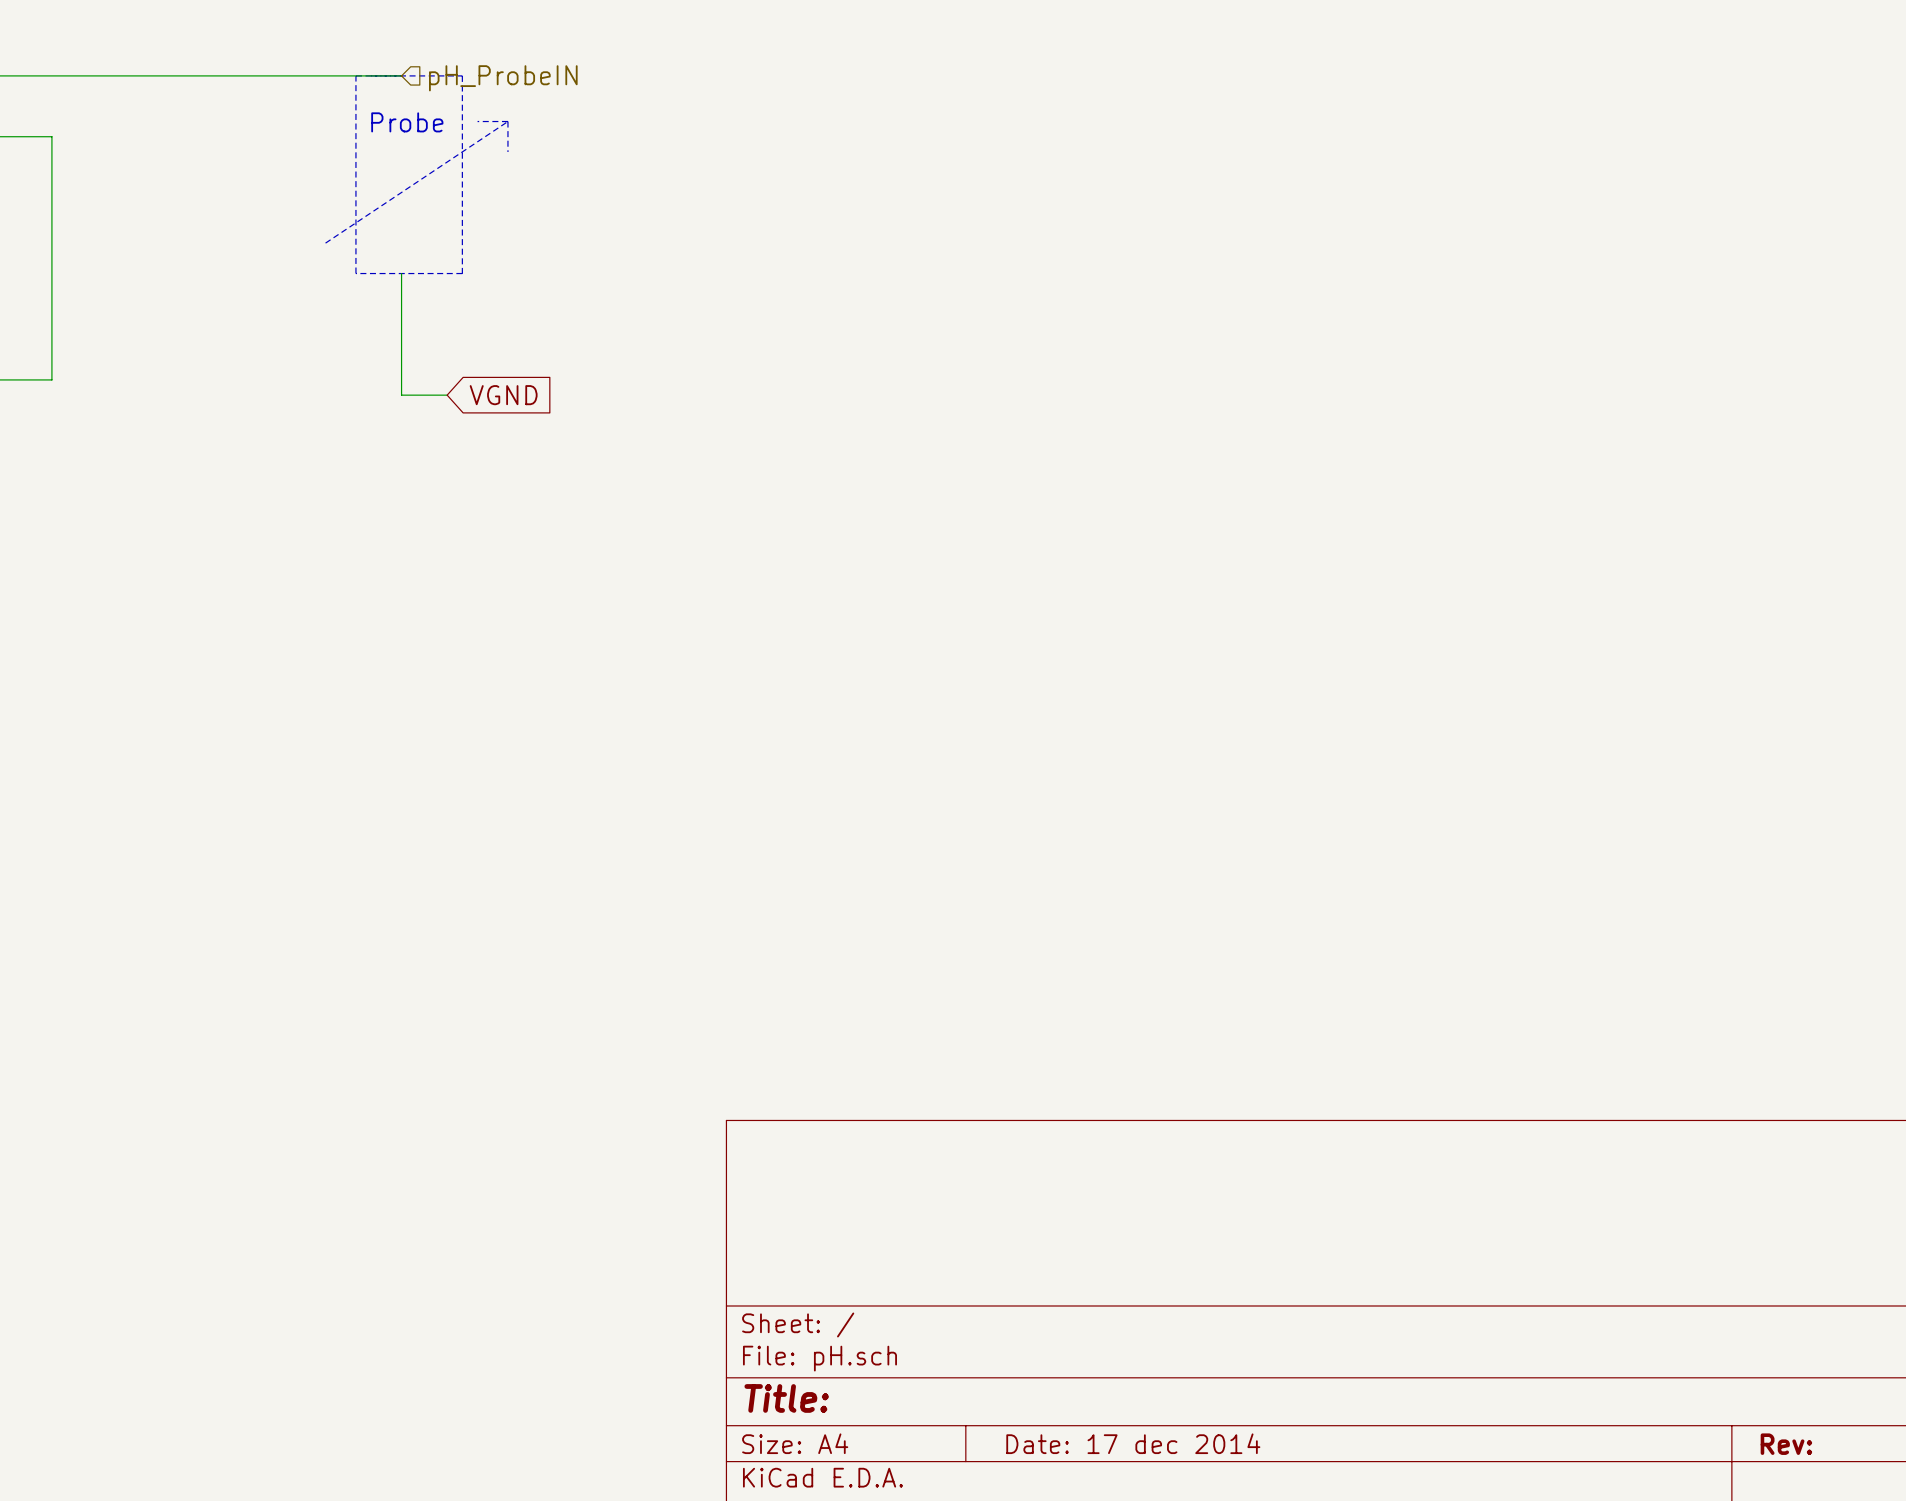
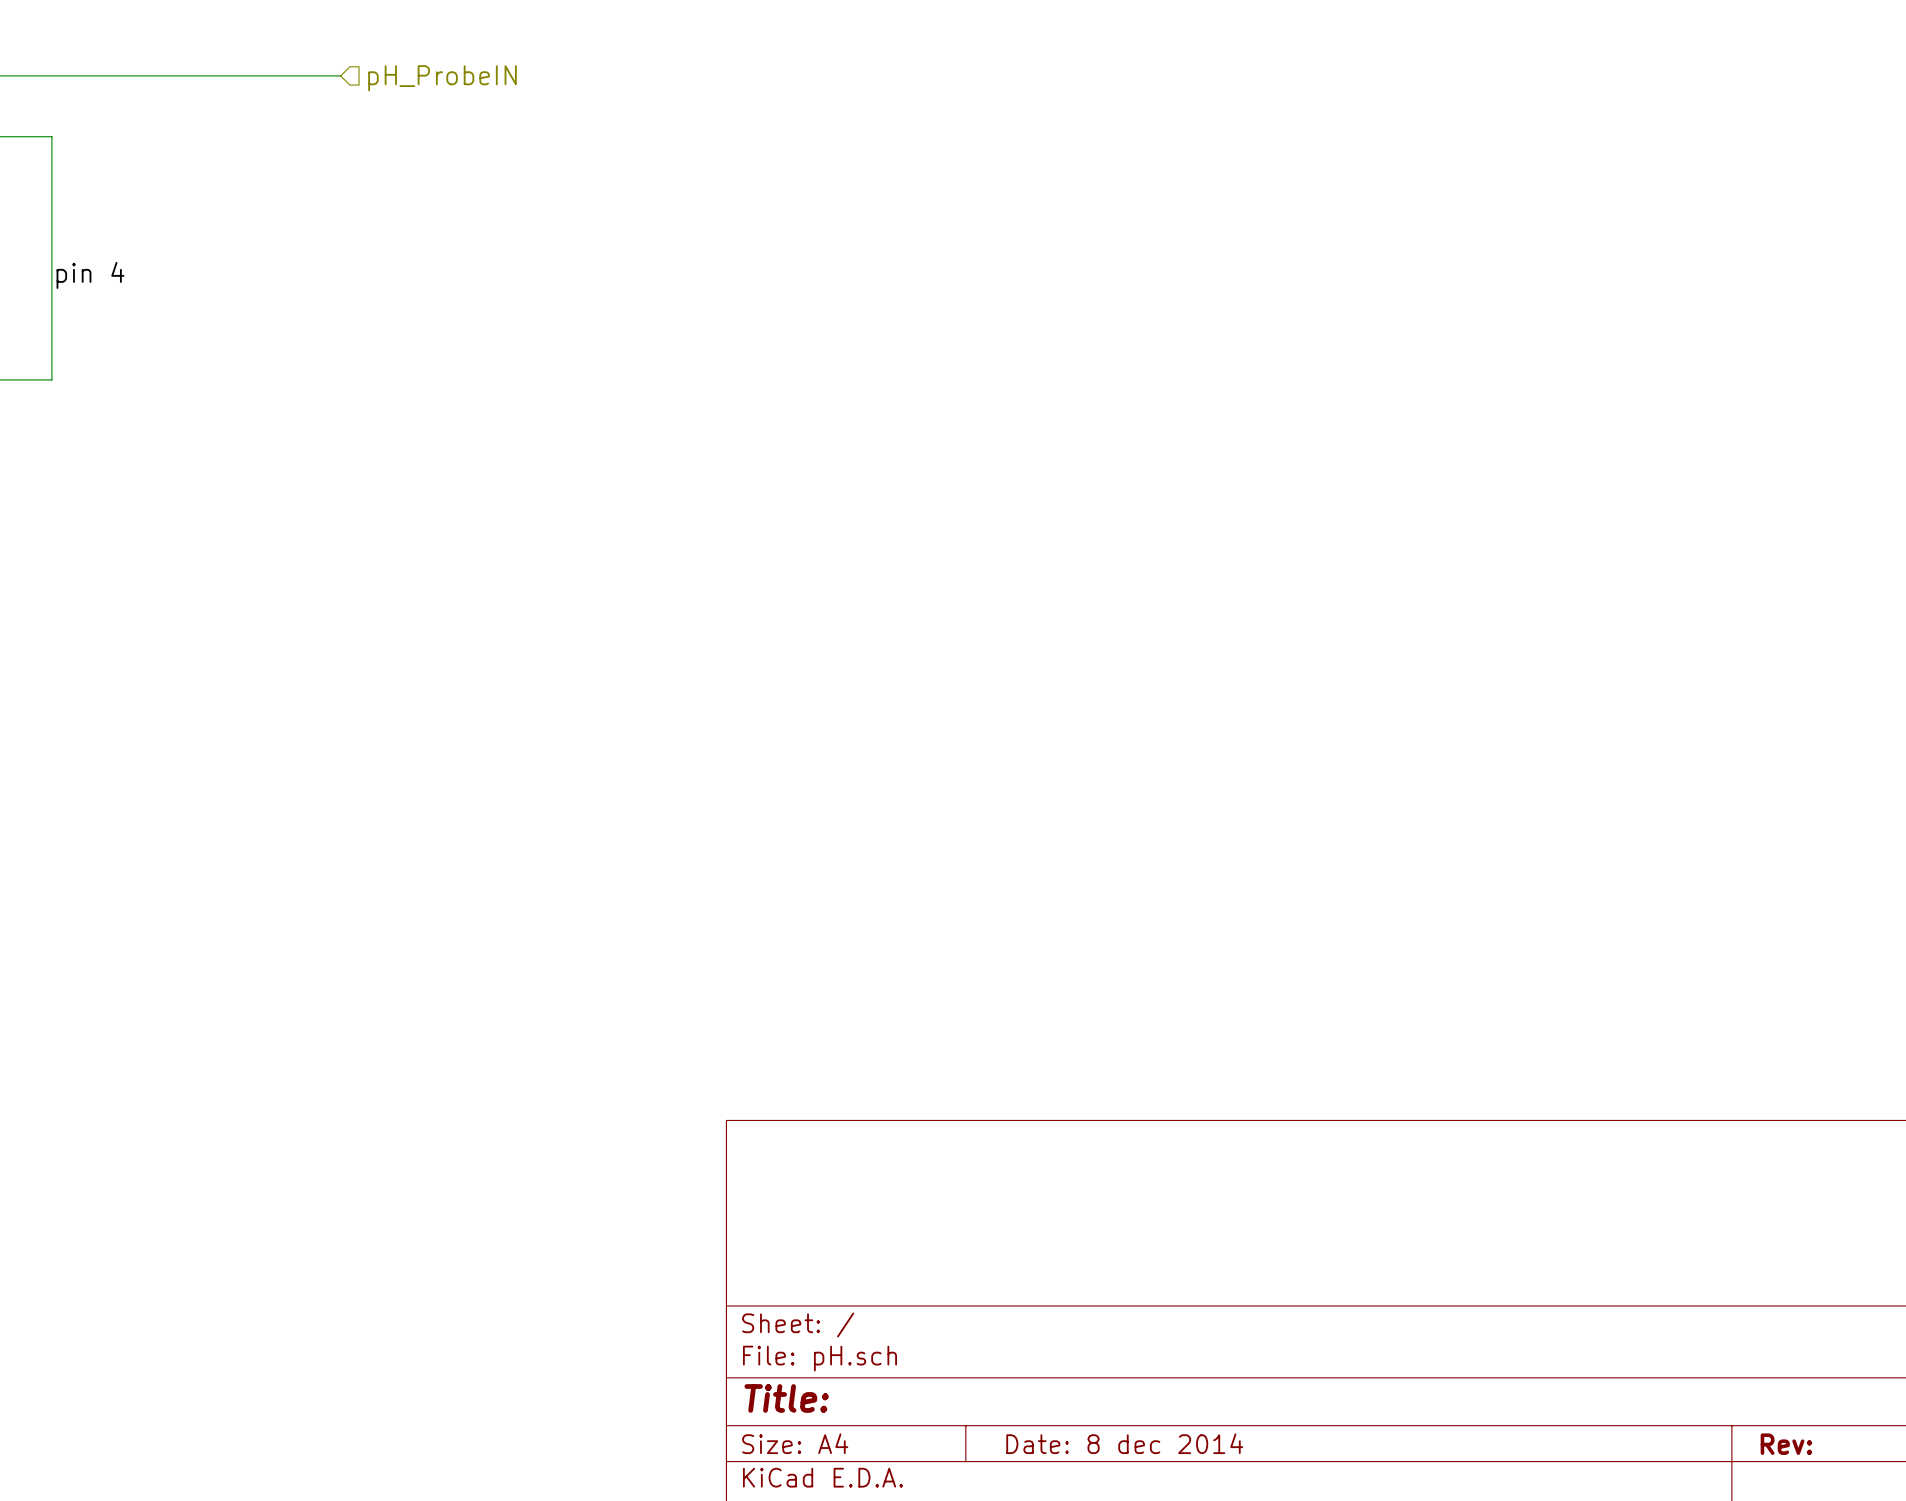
wire: (340, 75) (401, 75) -> none
line: (355, 75) (462, 75) (462, 273) (355, 273) (355, 75) -> none
hierarchical label position: pH_ProbeIN (503, 78) -> pH_ProbeIN (442, 78)
line: (477, 121) (507, 121) -> none
line: (507, 121) (325, 243) -> none
line: (507, 121) (507, 151) -> none
text: Probe (407, 122) -> none
wire: (401, 273) (401, 395) (447, 395) -> none
label: none -> pin 4 (90, 275)
global label: VGND (503, 395) -> none
title block: Date: 17 dec 2014 (1133, 1443) -> Date: 8 dec 2014 (1124, 1443)

